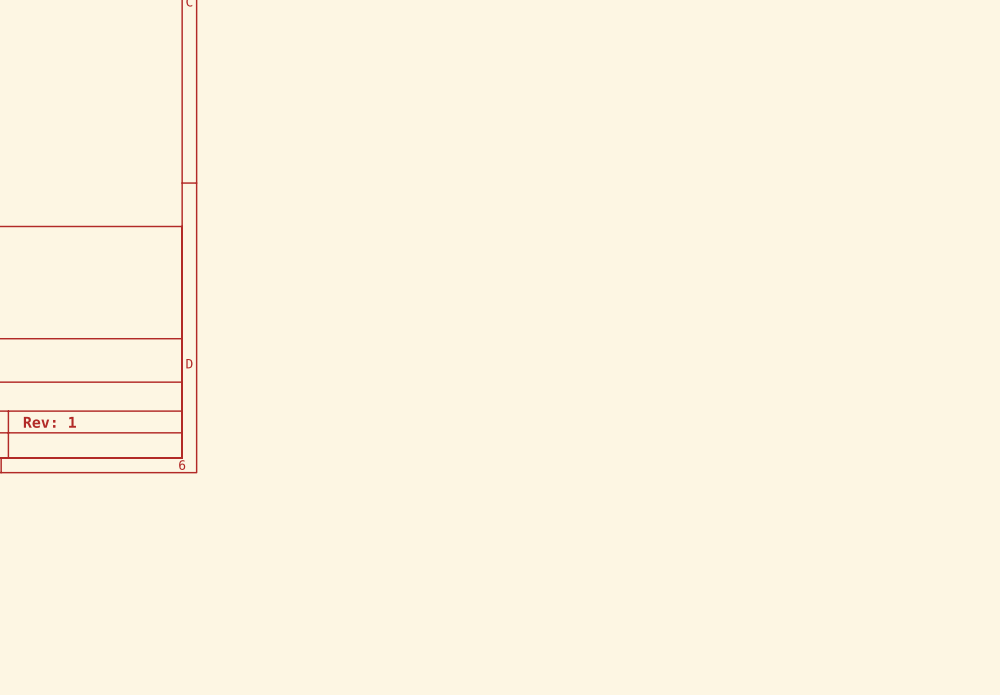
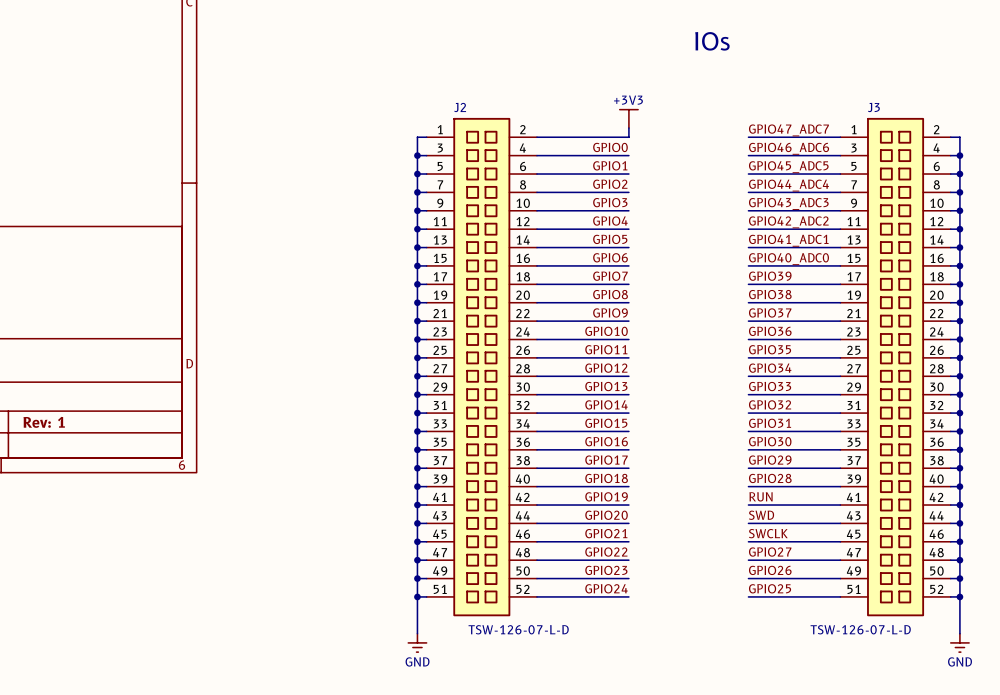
text: none -> IOs (712, 41)
power symbol: none -> +3V3 (628, 118)
wire: none -> (628, 128) (628, 137) (536, 137)
label: none -> GPIO47_ADC7 (788, 130)
wire: none -> (426, 137) (417, 137) (417, 633)
wire: none -> (748, 137) (840, 137)
wire: none -> (950, 137) (959, 137) (959, 633)
label: none -> GPIO0 (610, 147)
label: none -> GPIO46_ADC6 (789, 148)
wire: none -> (417, 155) (426, 155)
junction: none -> (417, 155)
wire: none -> (536, 155) (628, 155)
wire: none -> (748, 155) (840, 155)
wire: none -> (950, 155) (959, 155)
junction: none -> (959, 155)
label: none -> GPIO1 (610, 165)
label: none -> GPIO45_ADC5 (788, 167)
wire: none -> (417, 174) (426, 174)
junction: none -> (417, 174)
wire: none -> (536, 174) (628, 174)
wire: none -> (748, 174) (840, 174)
wire: none -> (950, 174) (959, 174)
junction: none -> (959, 174)
label: none -> GPIO2 (610, 184)
label: none -> GPIO44_ADC4 (788, 185)
wire: none -> (417, 192) (426, 192)
junction: none -> (417, 192)
wire: none -> (536, 192) (628, 192)
wire: none -> (748, 192) (840, 192)
wire: none -> (950, 192) (959, 192)
junction: none -> (959, 192)
label: none -> GPIO3 (610, 202)
label: none -> GPIO43_ADC3 (788, 203)
wire: none -> (417, 210) (426, 210)
junction: none -> (417, 210)
wire: none -> (536, 210) (628, 210)
wire: none -> (748, 210) (840, 210)
wire: none -> (950, 210) (959, 210)
junction: none -> (959, 210)
label: none -> GPIO4 (610, 221)
label: none -> GPIO42_ADC2 (788, 222)
wire: none -> (417, 229) (426, 229)
junction: none -> (417, 229)
wire: none -> (536, 229) (628, 229)
wire: none -> (748, 229) (840, 229)
wire: none -> (950, 229) (959, 229)
junction: none -> (959, 229)
label: none -> GPIO5 (610, 239)
label: none -> GPIO41_ADC1 (788, 240)
wire: none -> (417, 247) (426, 247)
junction: none -> (417, 247)
wire: none -> (536, 247) (628, 247)
wire: none -> (748, 247) (840, 247)
wire: none -> (950, 247) (959, 247)
junction: none -> (959, 247)
label: none -> GPIO6 (610, 257)
label: none -> GPIO40_ADC0 (788, 259)
wire: none -> (417, 265) (426, 265)
junction: none -> (417, 265)
wire: none -> (536, 265) (628, 265)
wire: none -> (748, 265) (840, 265)
wire: none -> (950, 265) (959, 265)
junction: none -> (959, 265)
label: none -> GPIO7 (610, 276)
label: none -> GPIO39 (770, 276)
wire: none -> (417, 284) (426, 284)
junction: none -> (417, 284)
wire: none -> (536, 284) (628, 284)
wire: none -> (748, 284) (840, 284)
wire: none -> (950, 284) (959, 284)
junction: none -> (959, 284)
label: none -> GPIO8 (610, 294)
label: none -> GPIO38 (770, 294)
wire: none -> (417, 302) (426, 302)
junction: none -> (417, 302)
wire: none -> (536, 302) (628, 302)
wire: none -> (748, 302) (840, 302)
wire: none -> (950, 302) (959, 302)
junction: none -> (959, 302)
label: none -> GPIO9 (610, 312)
label: none -> GPIO37 (770, 312)
wire: none -> (417, 321) (426, 321)
junction: none -> (417, 321)
wire: none -> (536, 321) (628, 321)
wire: none -> (748, 321) (840, 321)
wire: none -> (950, 321) (959, 321)
junction: none -> (959, 321)
label: none -> GPIO10 (606, 331)
label: none -> GPIO36 (770, 331)
wire: none -> (417, 339) (426, 339)
junction: none -> (417, 339)
wire: none -> (536, 339) (628, 339)
wire: none -> (748, 339) (840, 339)
wire: none -> (950, 339) (959, 339)
junction: none -> (959, 339)
label: none -> GPIO11 (606, 349)
label: none -> GPIO35 (770, 349)
wire: none -> (417, 357) (426, 357)
junction: none -> (417, 357)
wire: none -> (536, 357) (628, 357)
wire: none -> (748, 357) (840, 357)
wire: none -> (950, 357) (959, 357)
junction: none -> (959, 357)
J2: none -> TSW-126-07-L-D (481, 367)
J3: none -> TSW-126-07-L-D (895, 367)
label: none -> GPIO12 (606, 368)
label: none -> GPIO34 (770, 368)
wire: none -> (417, 376) (426, 376)
junction: none -> (417, 376)
wire: none -> (536, 376) (628, 376)
wire: none -> (748, 376) (840, 376)
wire: none -> (950, 376) (959, 376)
junction: none -> (959, 376)
label: none -> GPIO13 (606, 386)
label: none -> GPIO33 (770, 386)
wire: none -> (417, 394) (426, 394)
junction: none -> (417, 394)
wire: none -> (536, 394) (628, 394)
wire: none -> (748, 394) (840, 394)
wire: none -> (950, 394) (959, 394)
junction: none -> (959, 394)
label: none -> GPIO14 (606, 404)
label: none -> GPIO32 (770, 404)
wire: none -> (417, 413) (426, 413)
junction: none -> (417, 413)
wire: none -> (536, 413) (628, 413)
wire: none -> (748, 413) (840, 413)
wire: none -> (950, 413) (959, 413)
junction: none -> (959, 413)
label: none -> GPIO15 (606, 423)
label: none -> GPIO31 (770, 423)
wire: none -> (417, 431) (426, 431)
junction: none -> (417, 431)
wire: none -> (536, 431) (628, 431)
wire: none -> (748, 431) (840, 431)
wire: none -> (950, 431) (959, 431)
junction: none -> (959, 431)
label: none -> GPIO16 (606, 441)
label: none -> GPIO30 (770, 441)
wire: none -> (417, 449) (426, 449)
junction: none -> (417, 449)
wire: none -> (536, 449) (628, 449)
wire: none -> (748, 449) (840, 449)
wire: none -> (950, 449) (959, 449)
junction: none -> (959, 449)
label: none -> GPIO17 (606, 460)
label: none -> GPIO29 (770, 460)
wire: none -> (417, 468) (426, 468)
junction: none -> (417, 468)
wire: none -> (536, 468) (628, 468)
wire: none -> (748, 468) (840, 468)
wire: none -> (950, 468) (959, 468)
junction: none -> (959, 468)
label: none -> GPIO18 (606, 478)
label: none -> GPIO28 (770, 478)
wire: none -> (417, 486) (426, 486)
junction: none -> (417, 486)
wire: none -> (536, 486) (628, 486)
wire: none -> (748, 486) (840, 486)
wire: none -> (950, 486) (959, 486)
junction: none -> (959, 486)
label: none -> GPIO19 (606, 496)
label: none -> RUN (761, 496)
wire: none -> (417, 505) (426, 505)
junction: none -> (417, 505)
wire: none -> (536, 505) (628, 505)
wire: none -> (748, 505) (840, 505)
wire: none -> (950, 505) (959, 505)
junction: none -> (959, 505)
label: none -> GPIO20 (606, 515)
label: none -> SWD (761, 515)
wire: none -> (417, 523) (426, 523)
junction: none -> (417, 523)
wire: none -> (536, 523) (628, 523)
wire: none -> (748, 523) (840, 523)
wire: none -> (950, 523) (959, 523)
junction: none -> (959, 523)
label: none -> GPIO21 (606, 533)
label: none -> SWCLK (768, 533)
wire: none -> (417, 541) (426, 541)
junction: none -> (417, 541)
wire: none -> (536, 541) (628, 541)
wire: none -> (748, 541) (840, 541)
wire: none -> (950, 541) (959, 541)
junction: none -> (959, 541)
label: none -> GPIO22 (606, 552)
label: none -> GPIO27 (770, 552)
wire: none -> (417, 560) (426, 560)
junction: none -> (417, 560)
wire: none -> (536, 560) (628, 560)
wire: none -> (748, 560) (840, 560)
wire: none -> (950, 560) (959, 560)
junction: none -> (959, 560)
label: none -> GPIO23 (606, 570)
label: none -> GPIO26 (770, 570)
wire: none -> (417, 578) (426, 578)
junction: none -> (417, 578)
wire: none -> (536, 578) (628, 578)
wire: none -> (748, 578) (840, 578)
wire: none -> (950, 578) (959, 578)
junction: none -> (959, 578)
label: none -> GPIO24 (606, 588)
label: none -> GPIO25 (770, 588)
wire: none -> (417, 596) (426, 596)
junction: none -> (417, 596)
wire: none -> (536, 596) (628, 596)
wire: none -> (748, 596) (840, 596)
wire: none -> (950, 596) (959, 596)
junction: none -> (959, 596)
power symbol: none -> GND (417, 642)
power symbol: none -> GND (959, 642)

